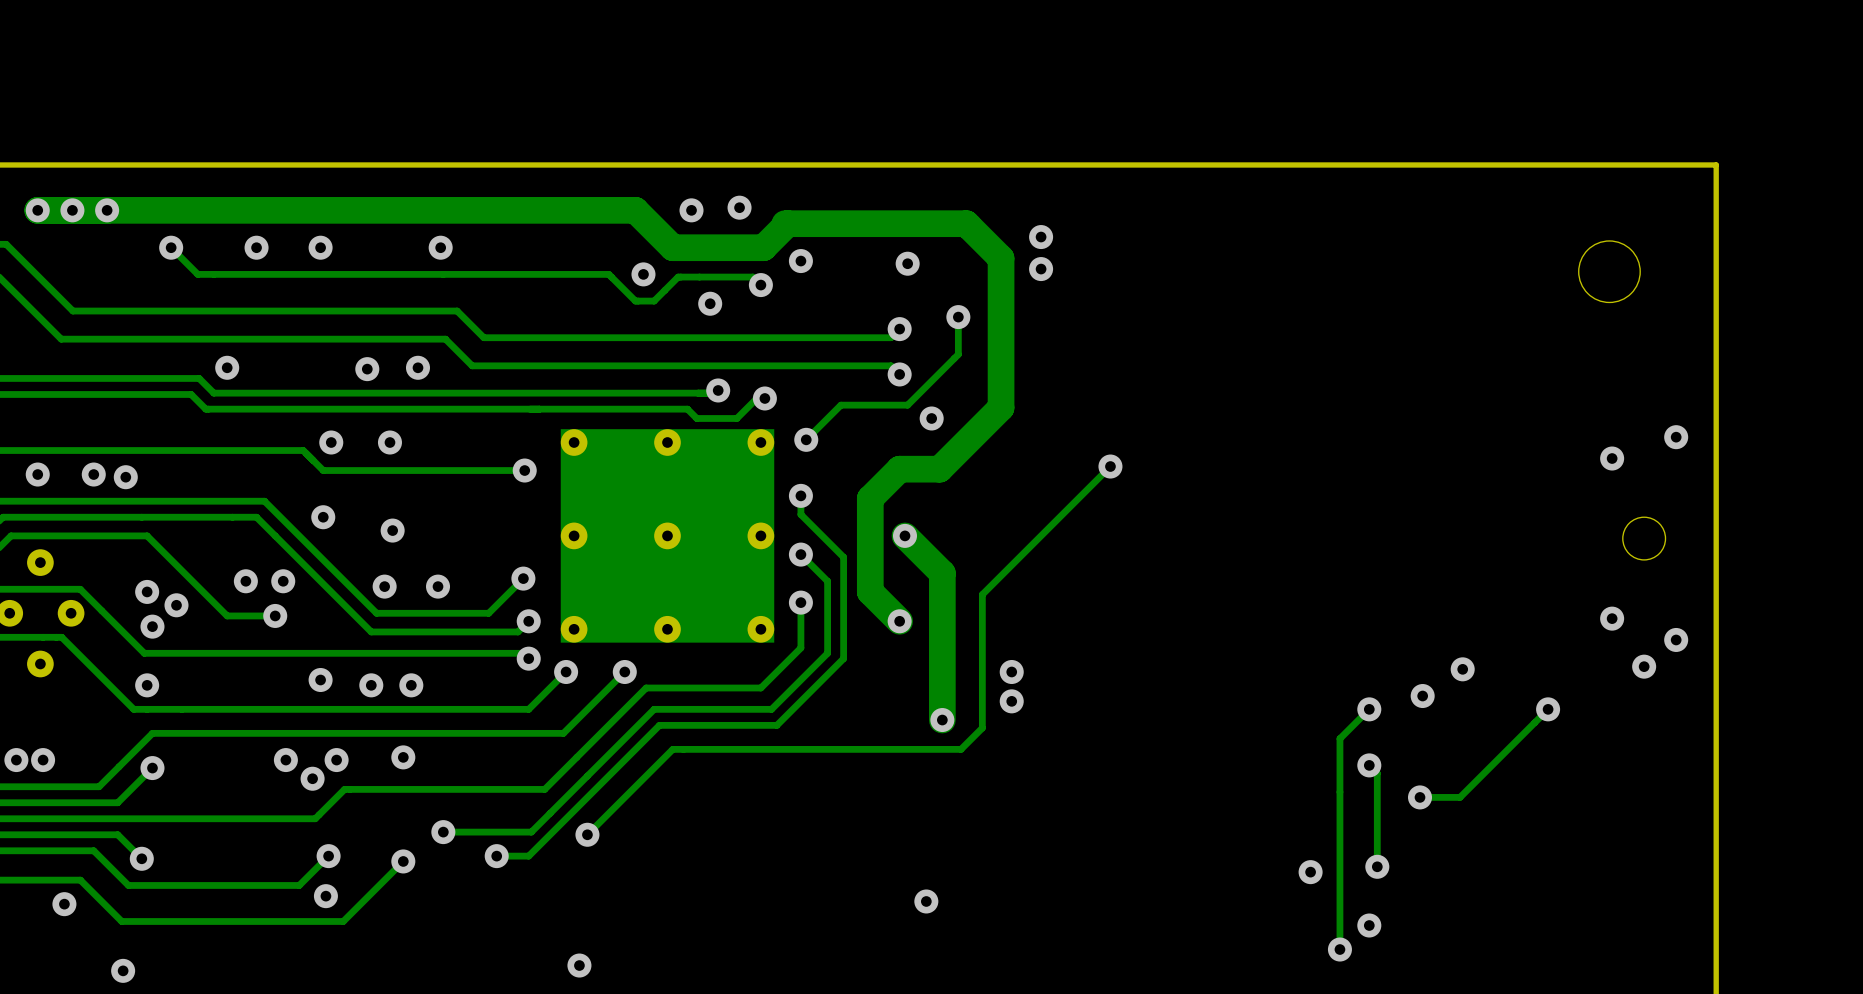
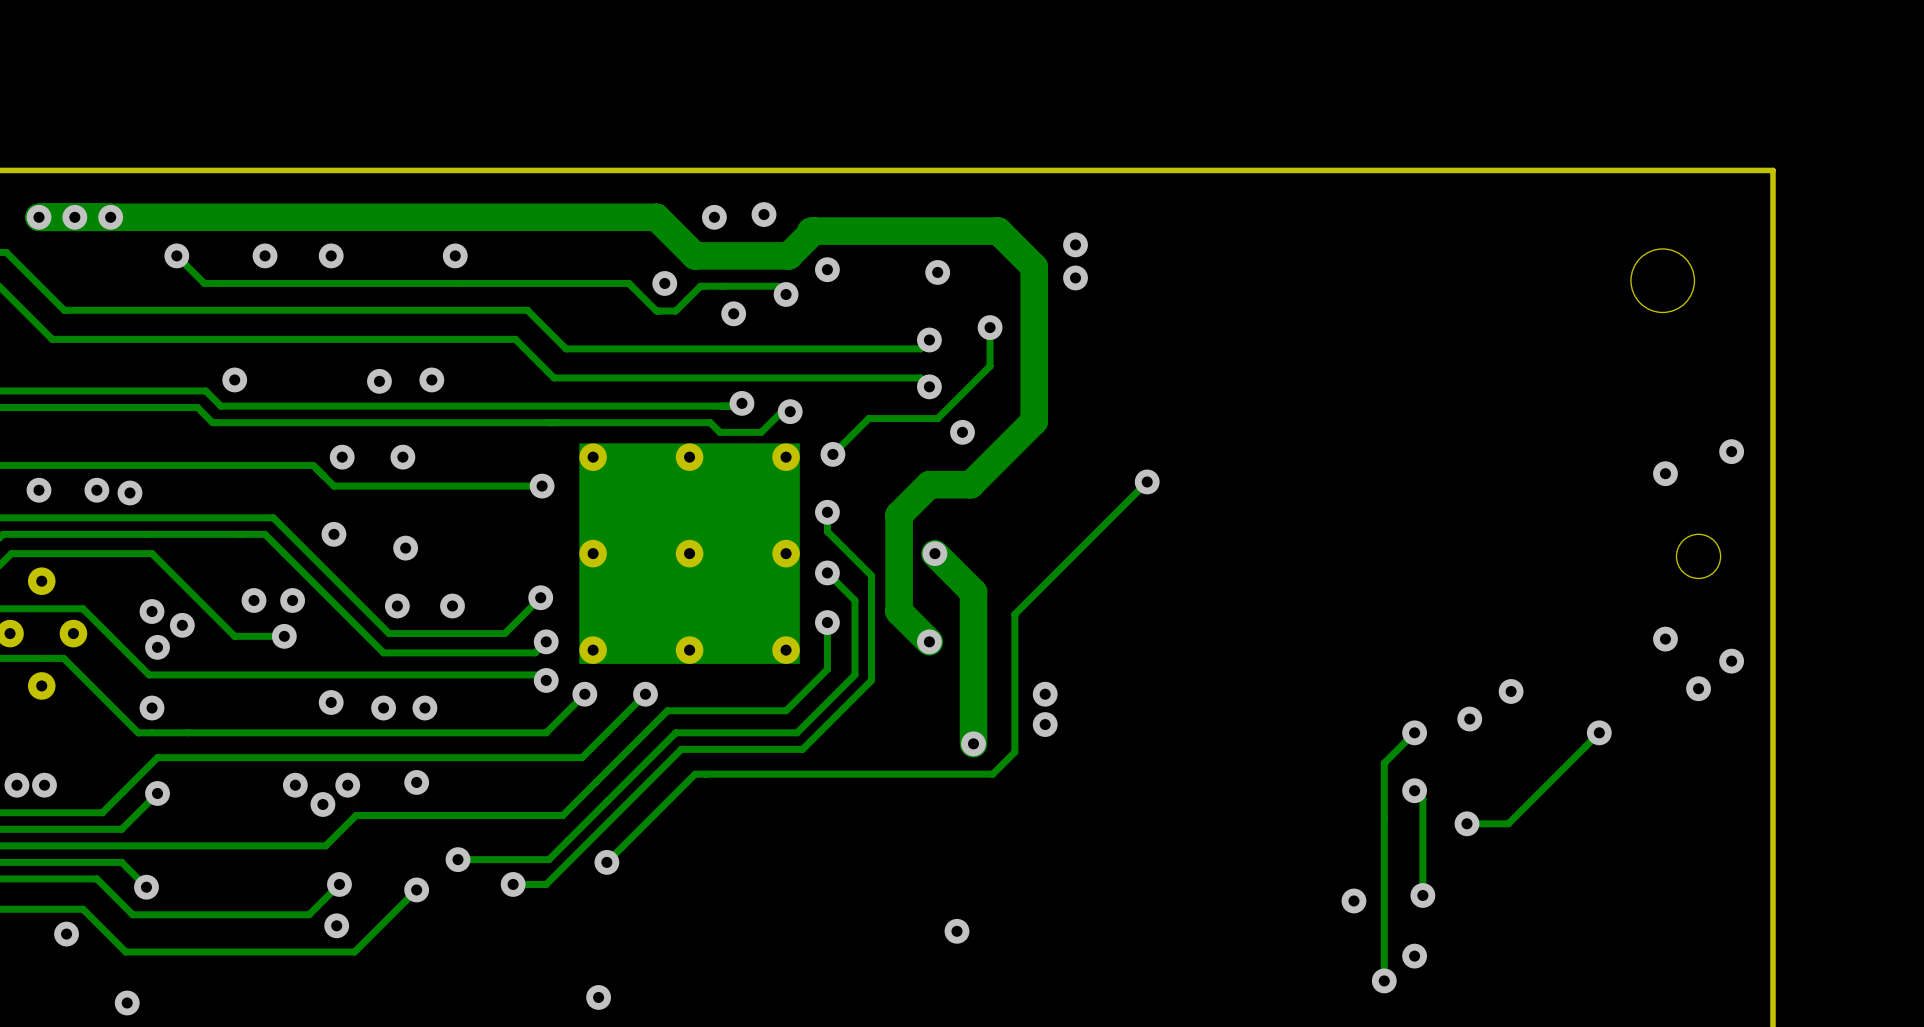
track: (62, 300) (72, 311) (457, 311) (483, 337) (547, 337) -> (64, 310) (527, 310) (566, 348)
track: (50, 328) (61, 339) (445, 339) (472, 365) (536, 365) -> (52, 339) (515, 339) (553, 377)

